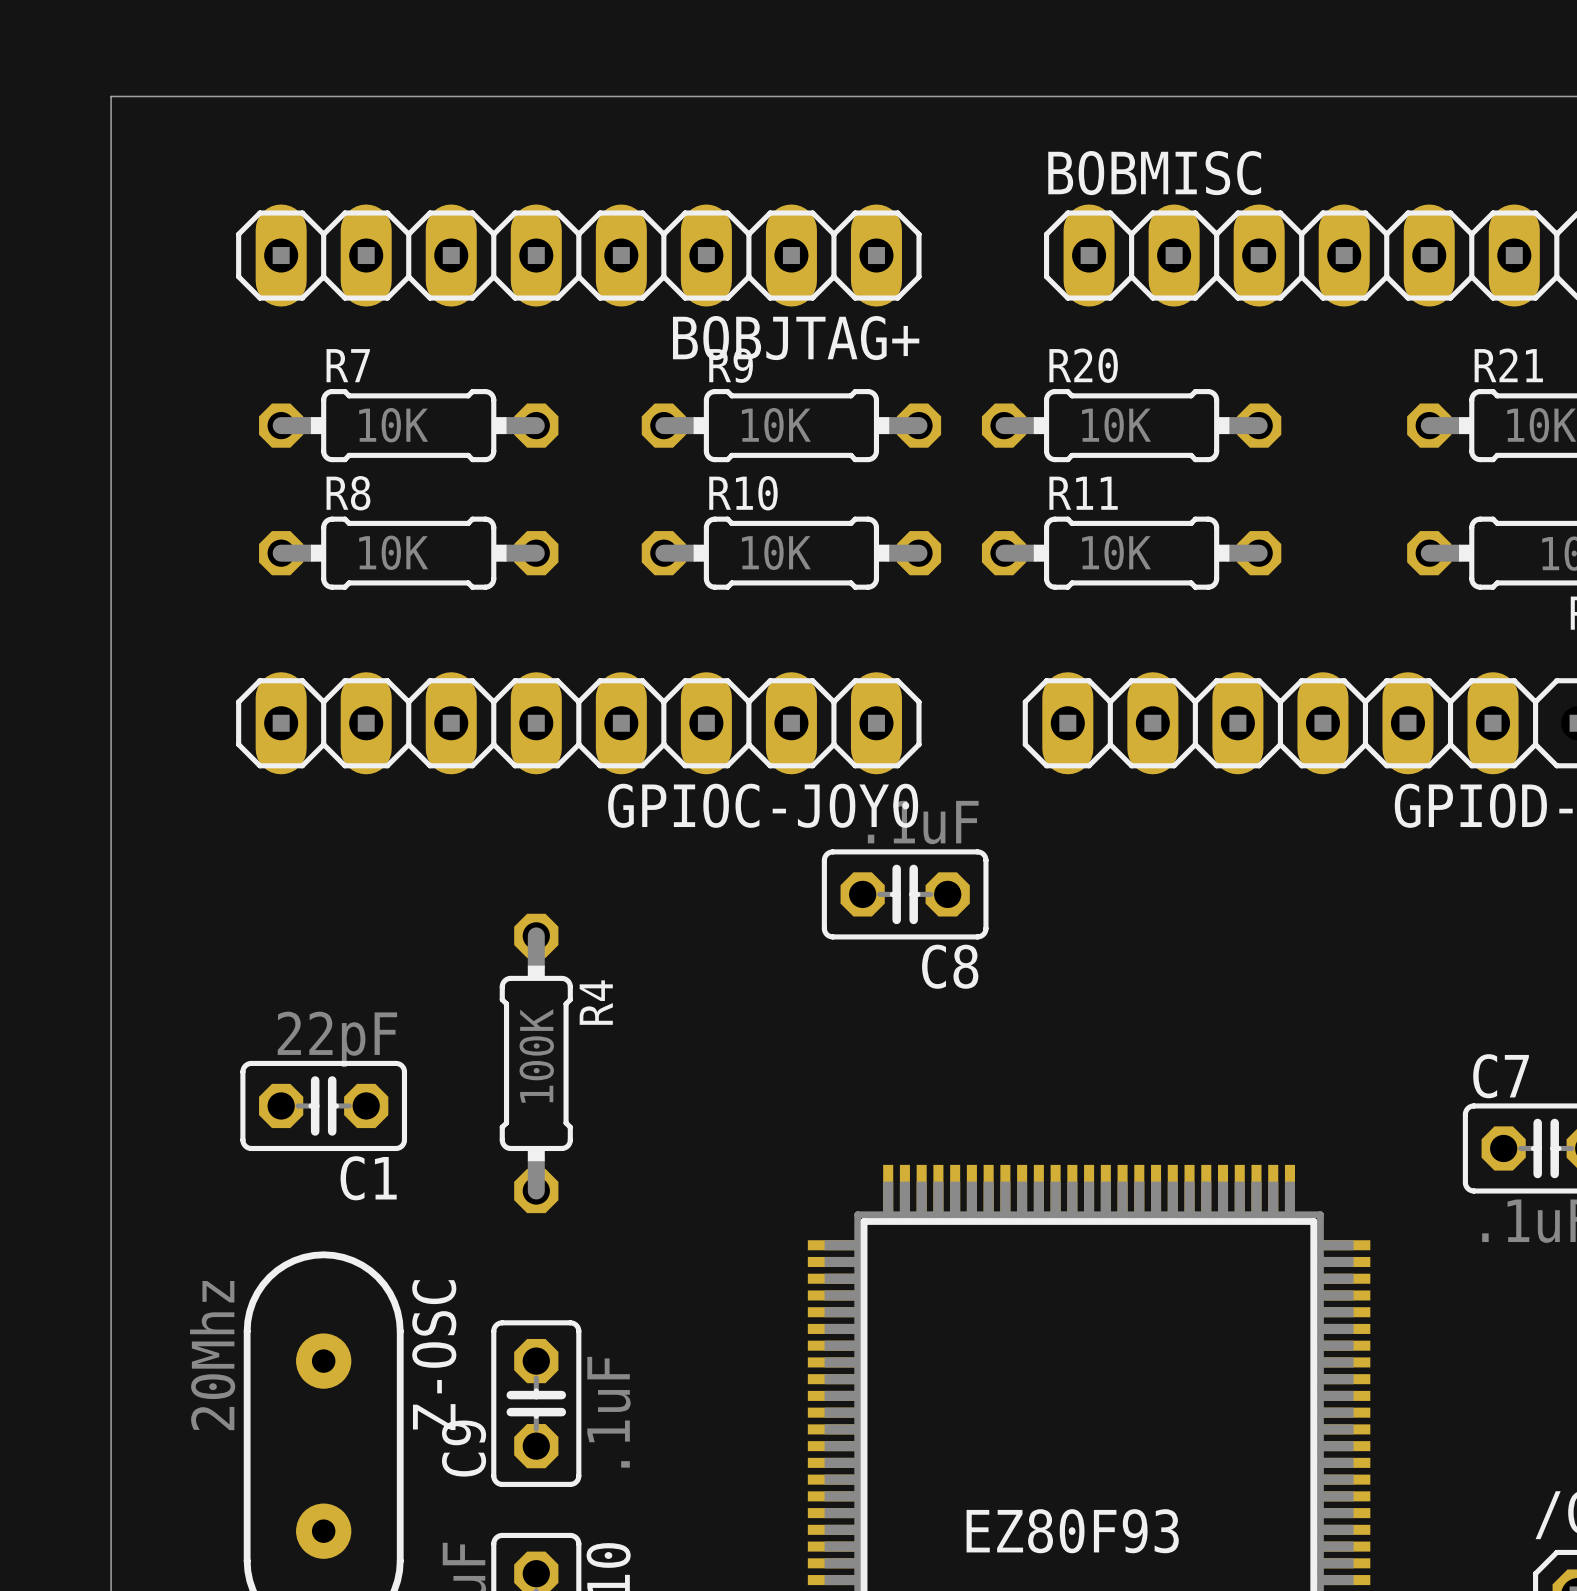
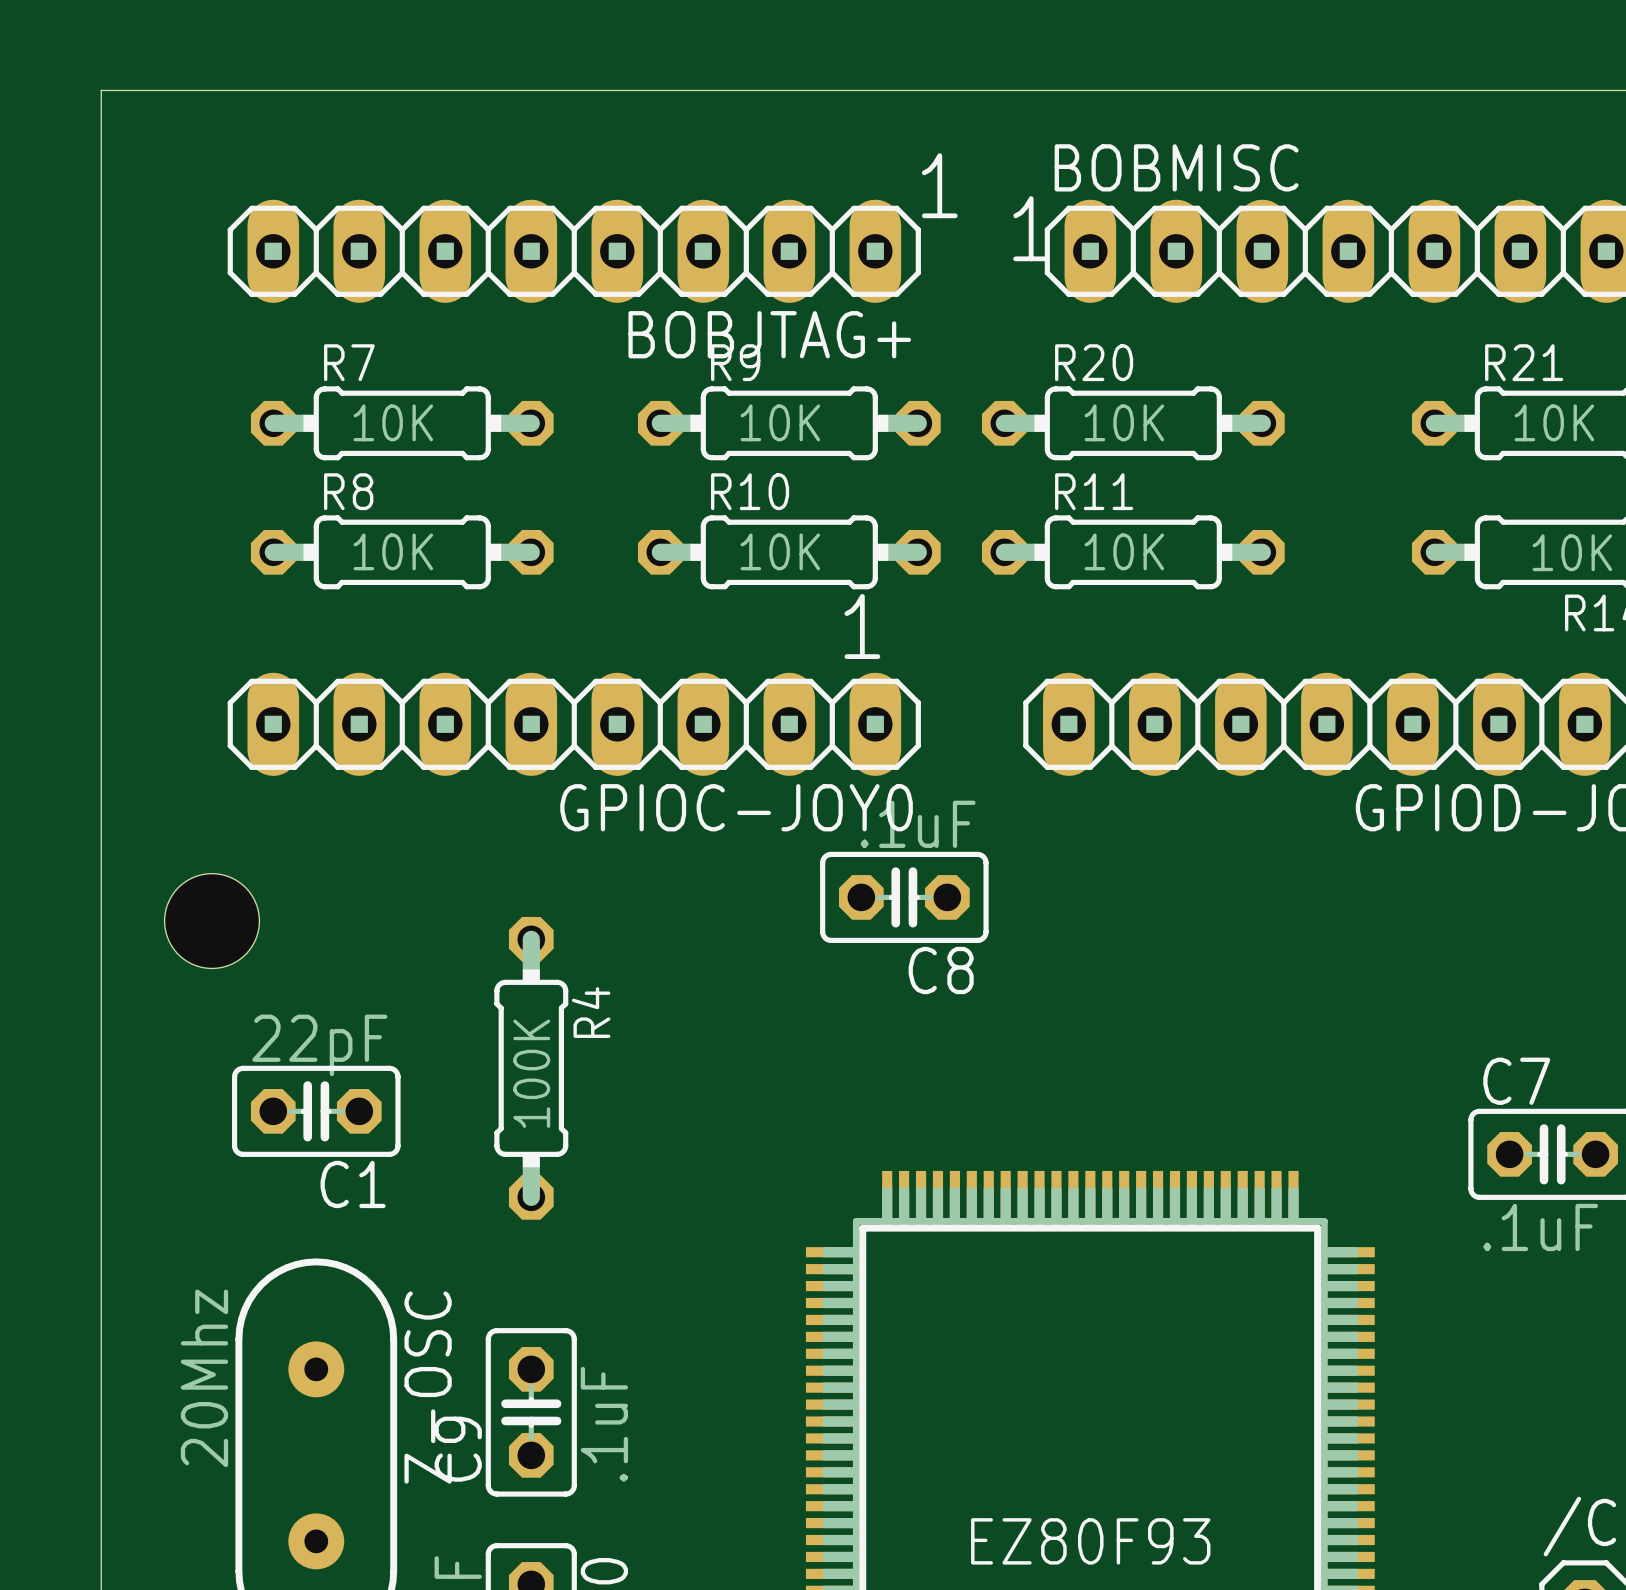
text: none -> 1 (939, 185)
text: none -> 1 (1031, 228)
text: none -> 1 (862, 626)
hole: none -> (212, 921)

